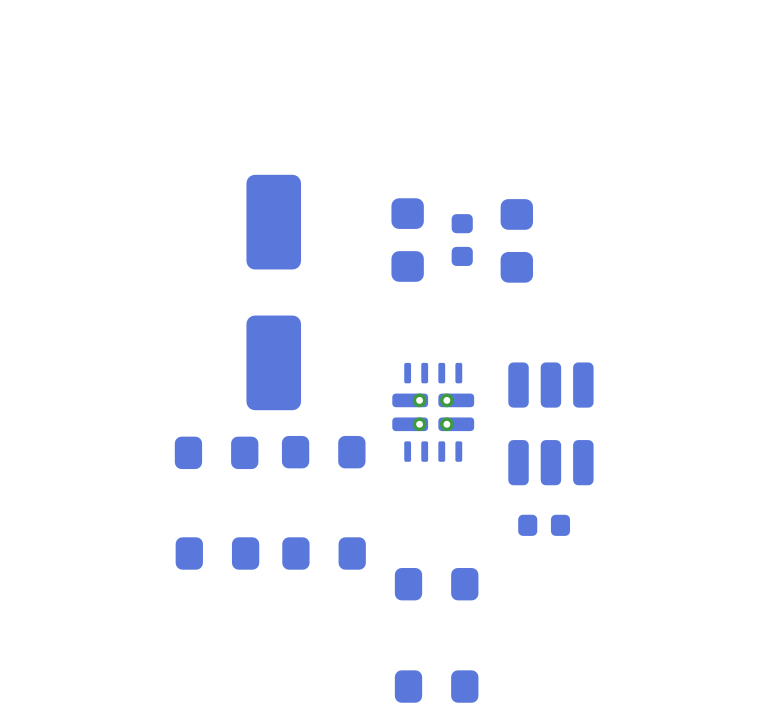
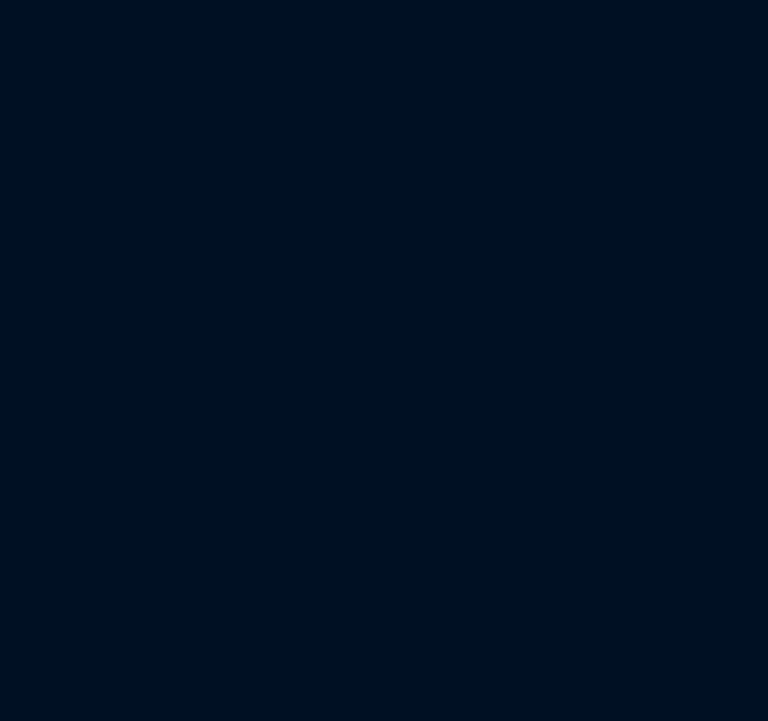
part: (407, 240) -> none
part: (462, 240) -> none
part: (516, 240) -> none
part: (273, 292) -> none
part: (433, 412) -> none
part: (550, 423) -> none
part: (216, 452) -> none
part: (323, 452) -> none
part: (544, 525) -> none
part: (217, 553) -> none
part: (324, 553) -> none
part: (436, 584) -> none
part: (436, 686) -> none

